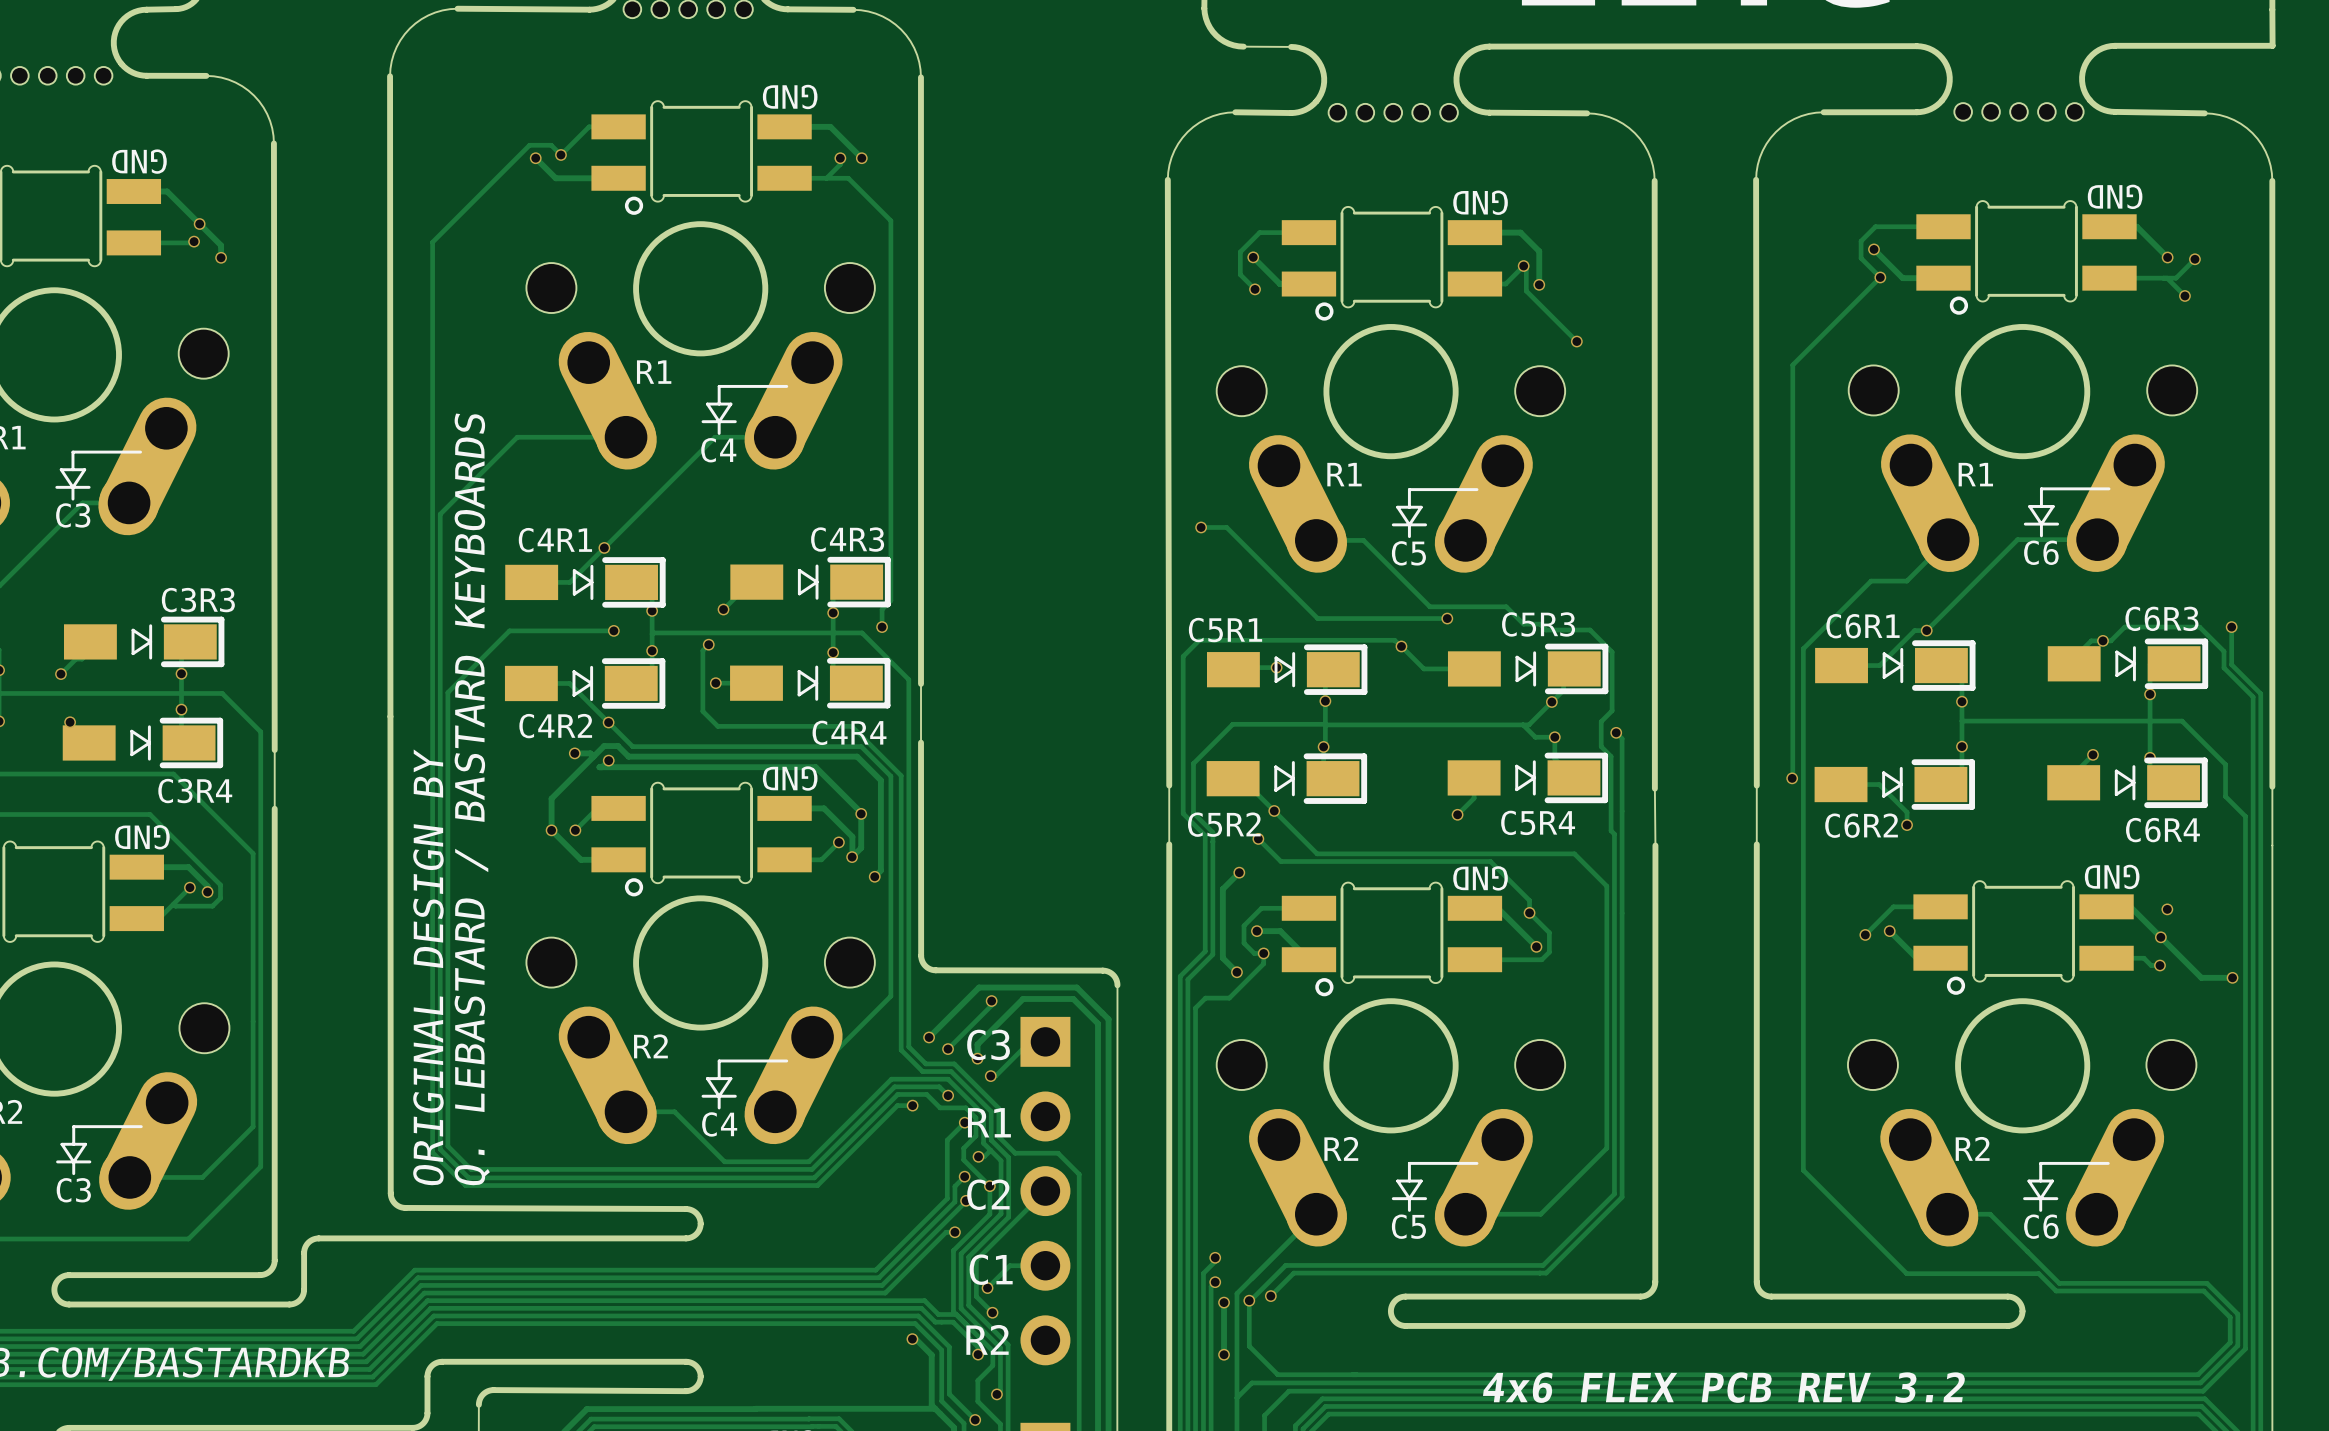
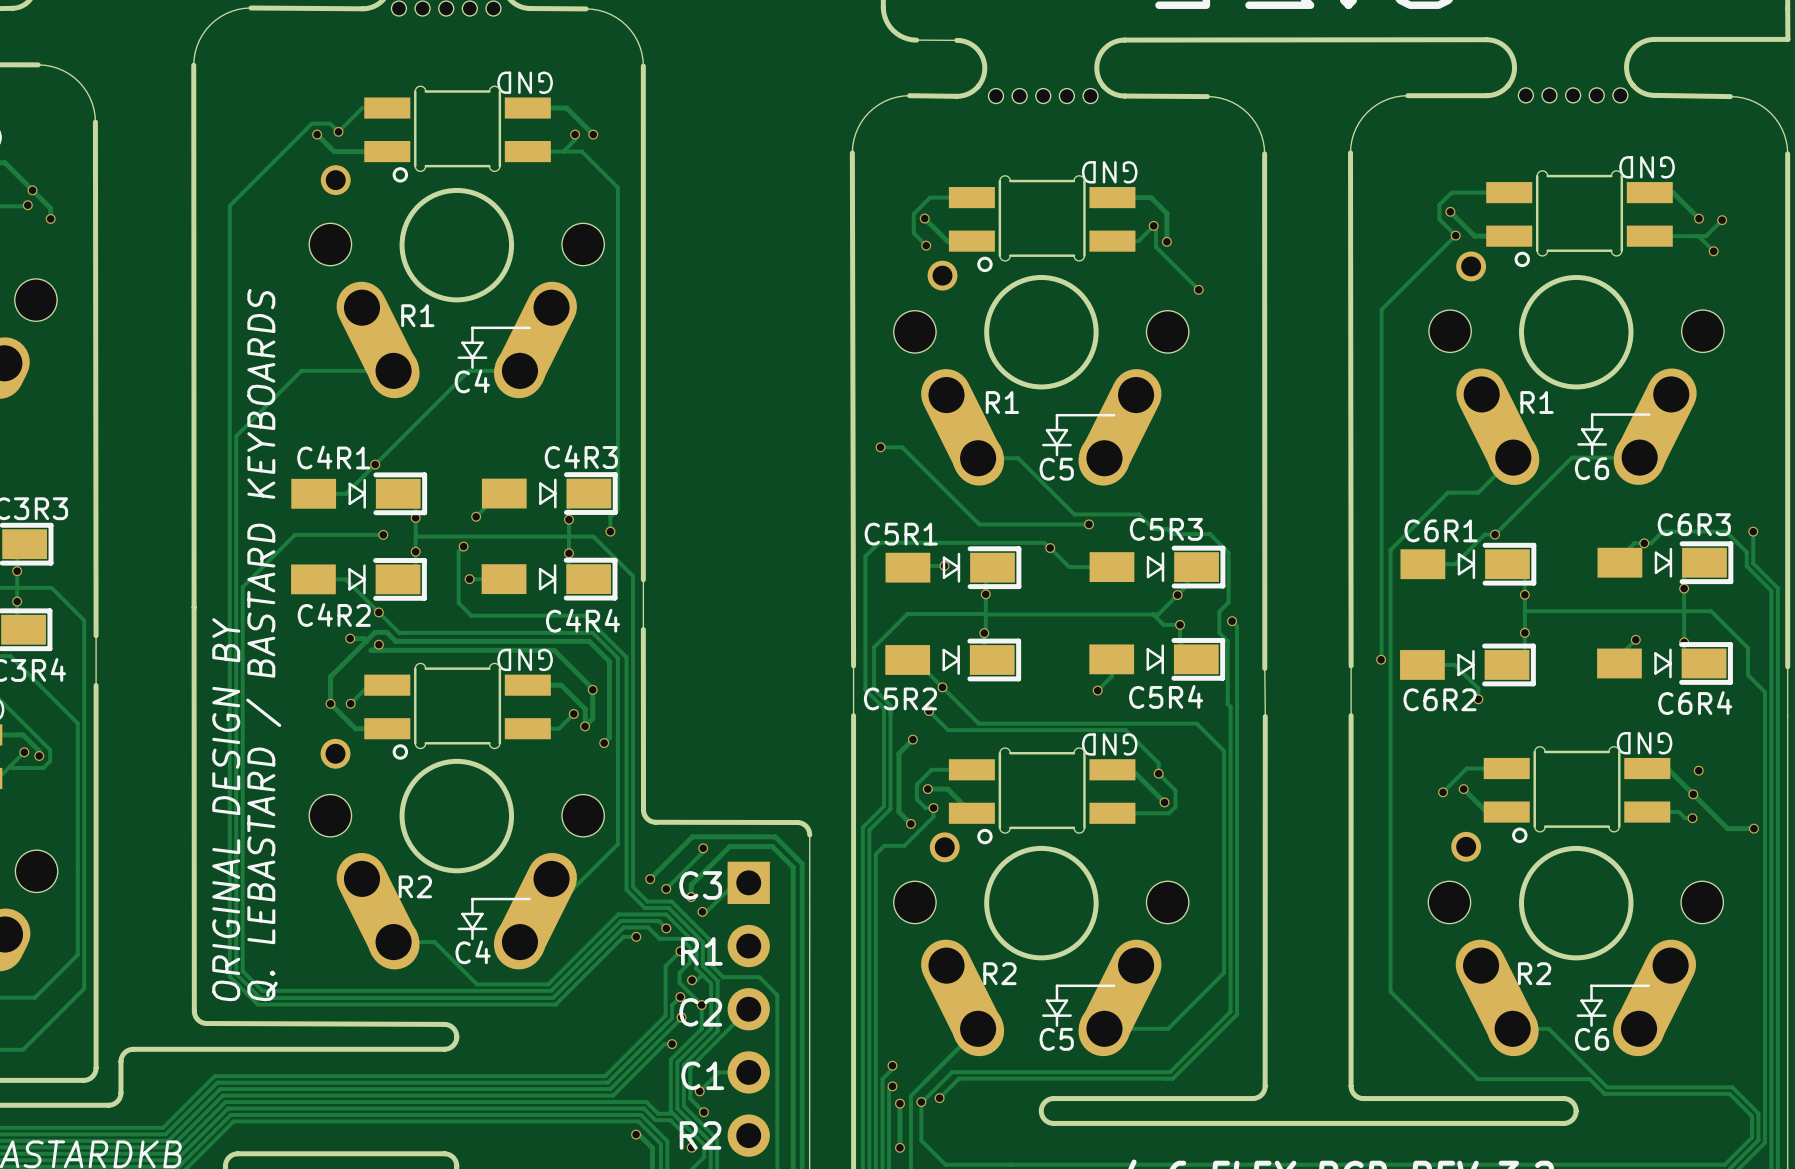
part: none -> (335, 180)
part: none -> (1471, 266)
part: none -> (942, 275)
part: none -> (335, 753)
part: none -> (944, 847)
part: none -> (1466, 846)

